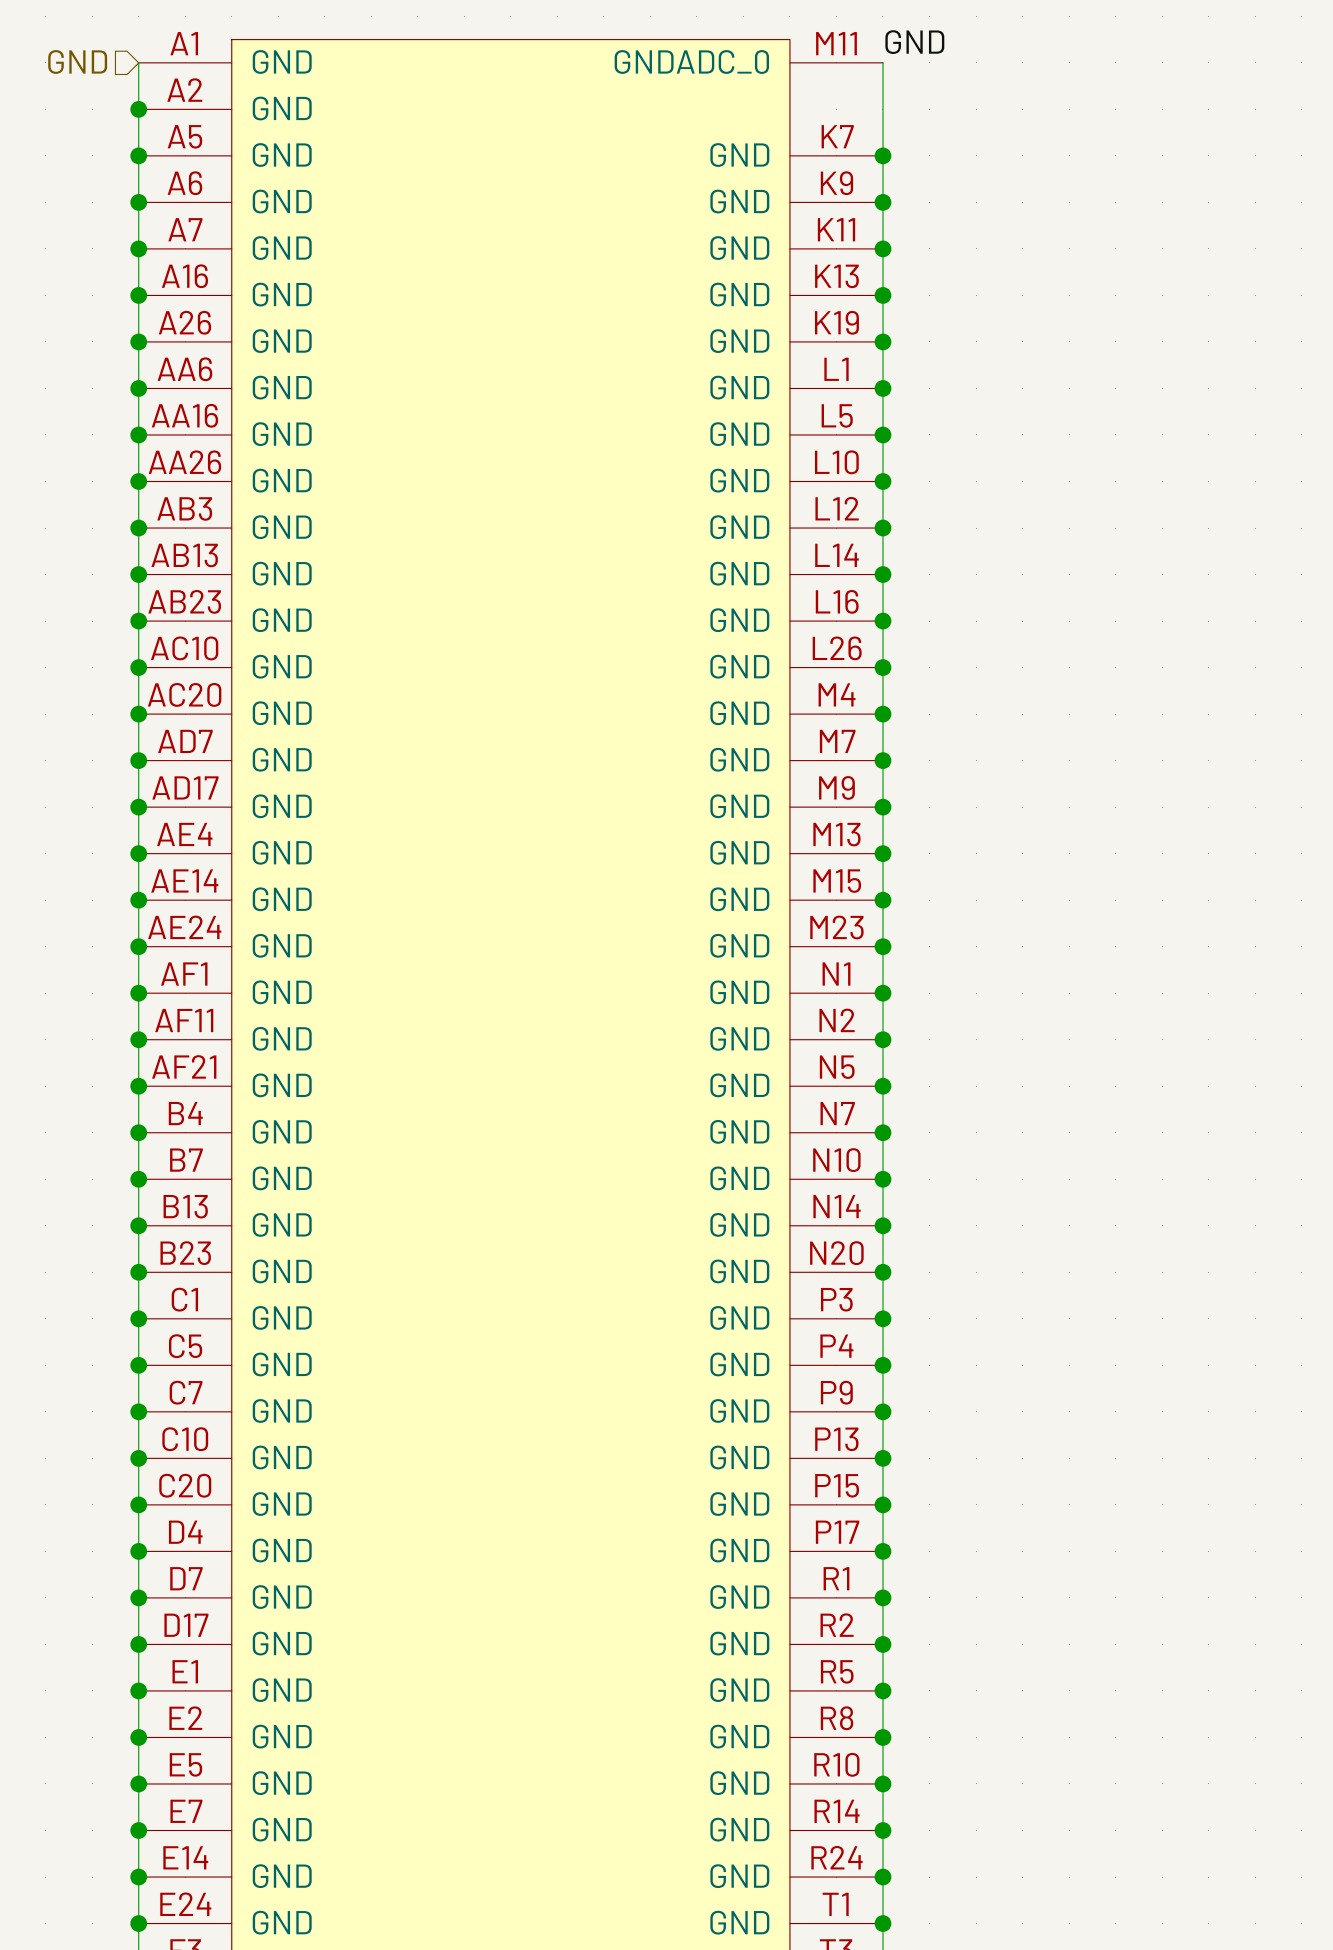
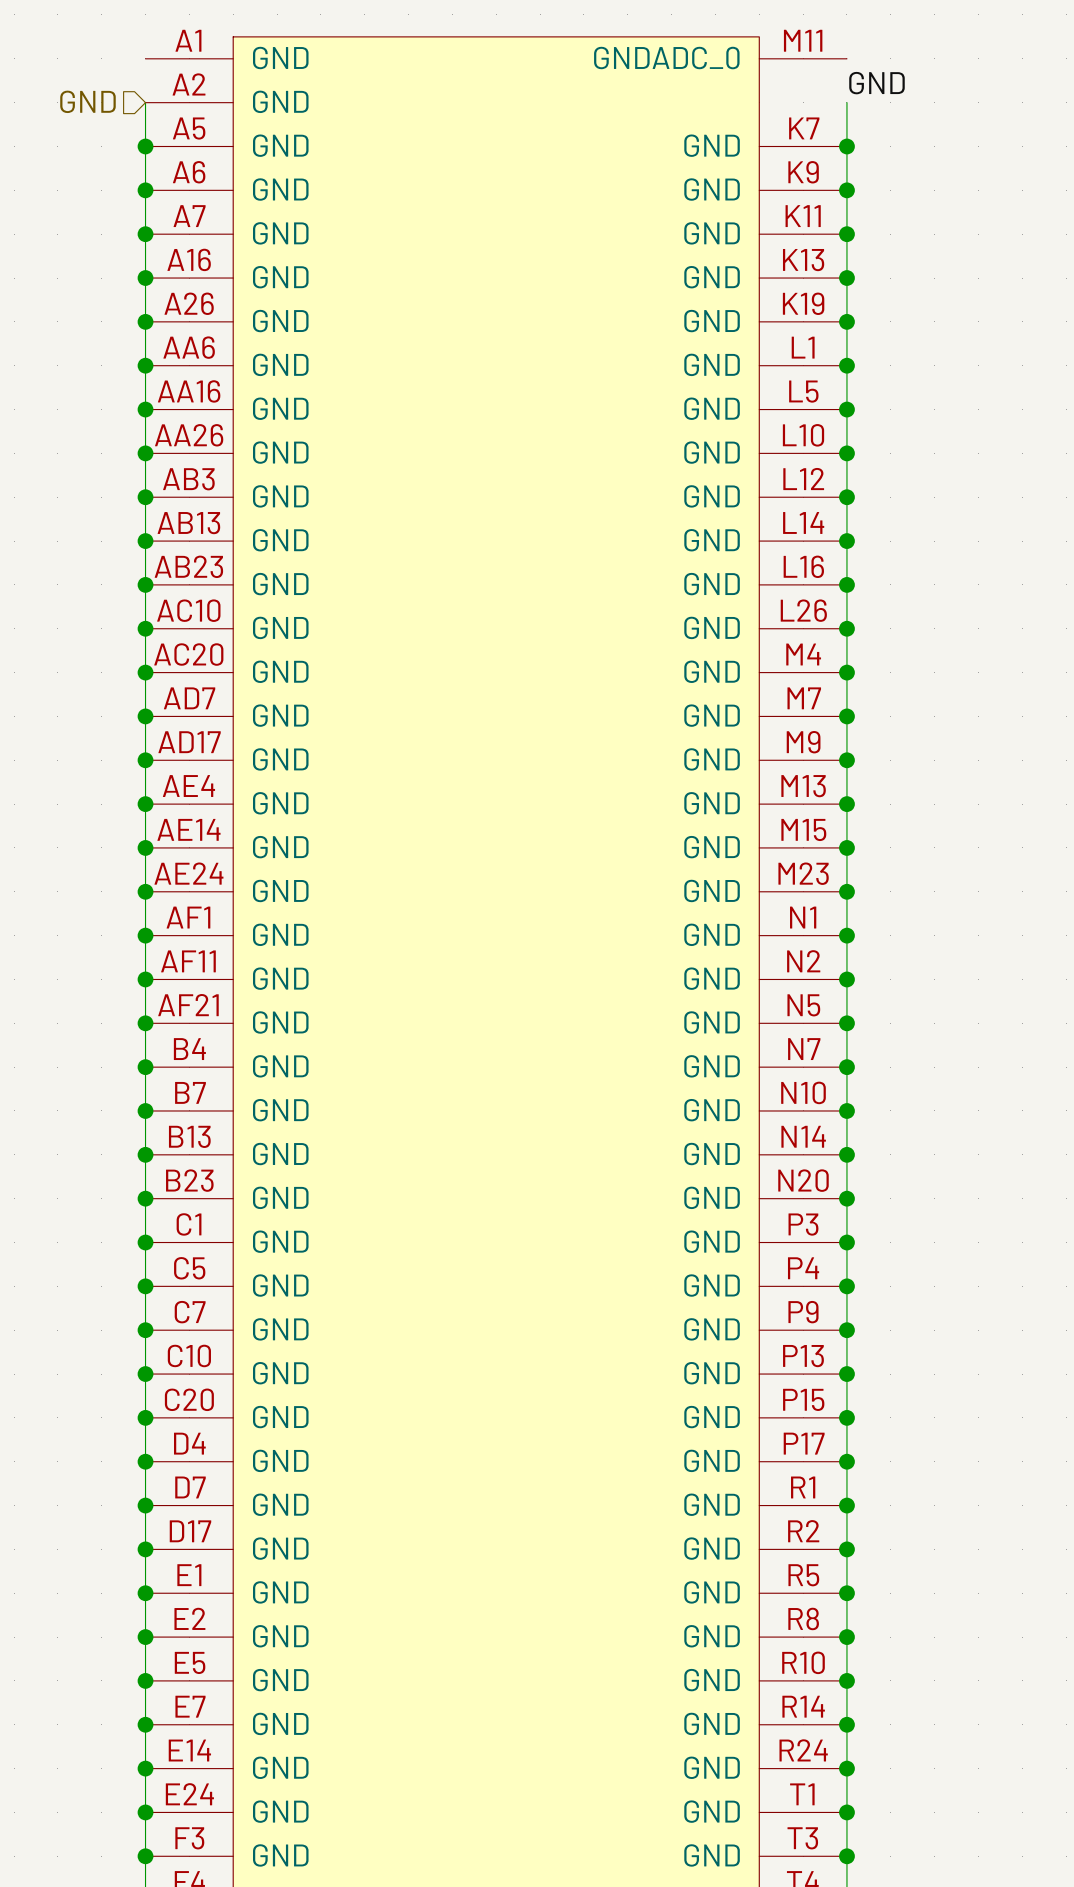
label position: GND (914, 42) -> GND (876, 83)
hierarchical label position: GND (77, 61) -> GND (87, 101)
wire: (138, 62) (138, 109) -> none
wire: (882, 62) (882, 109) -> none
junction: (138, 109) -> none

